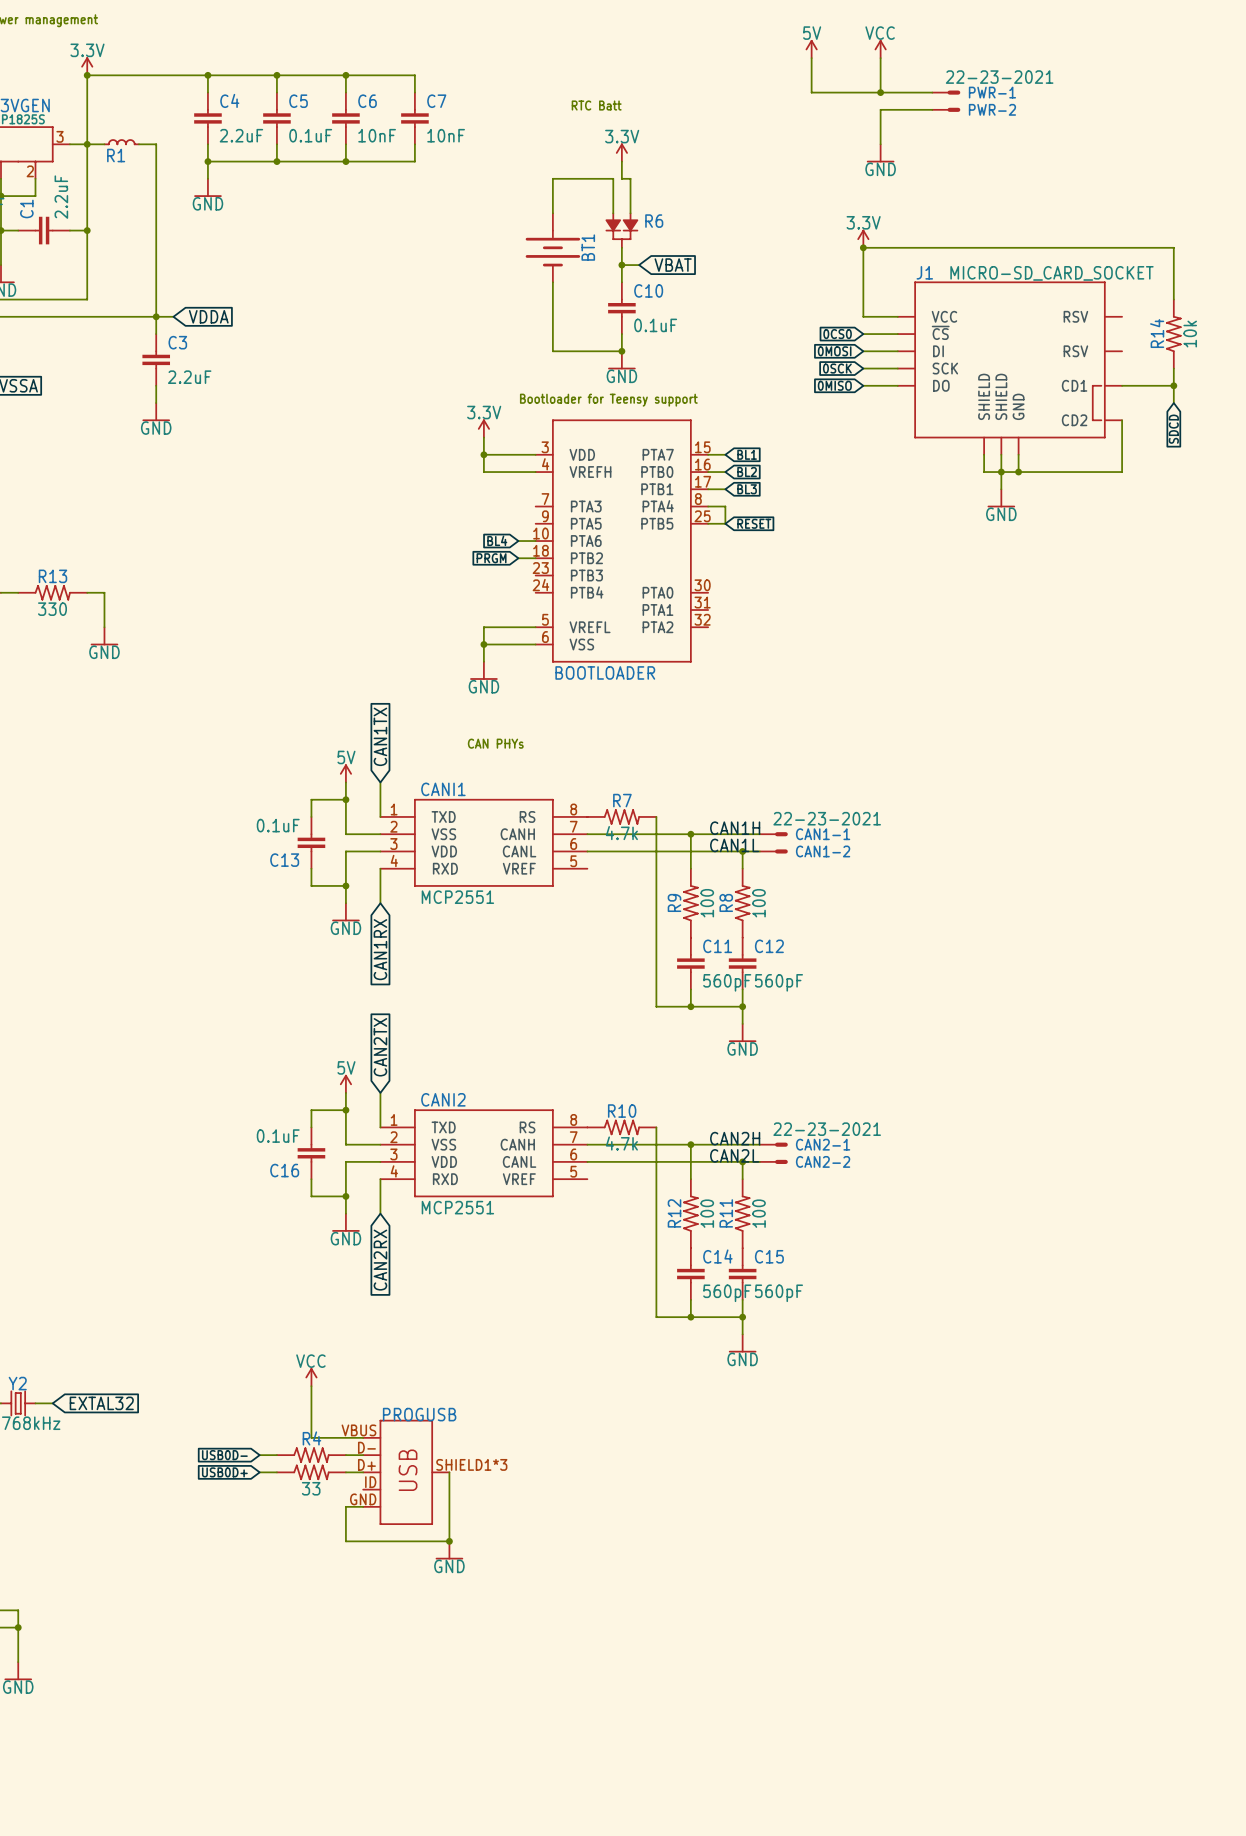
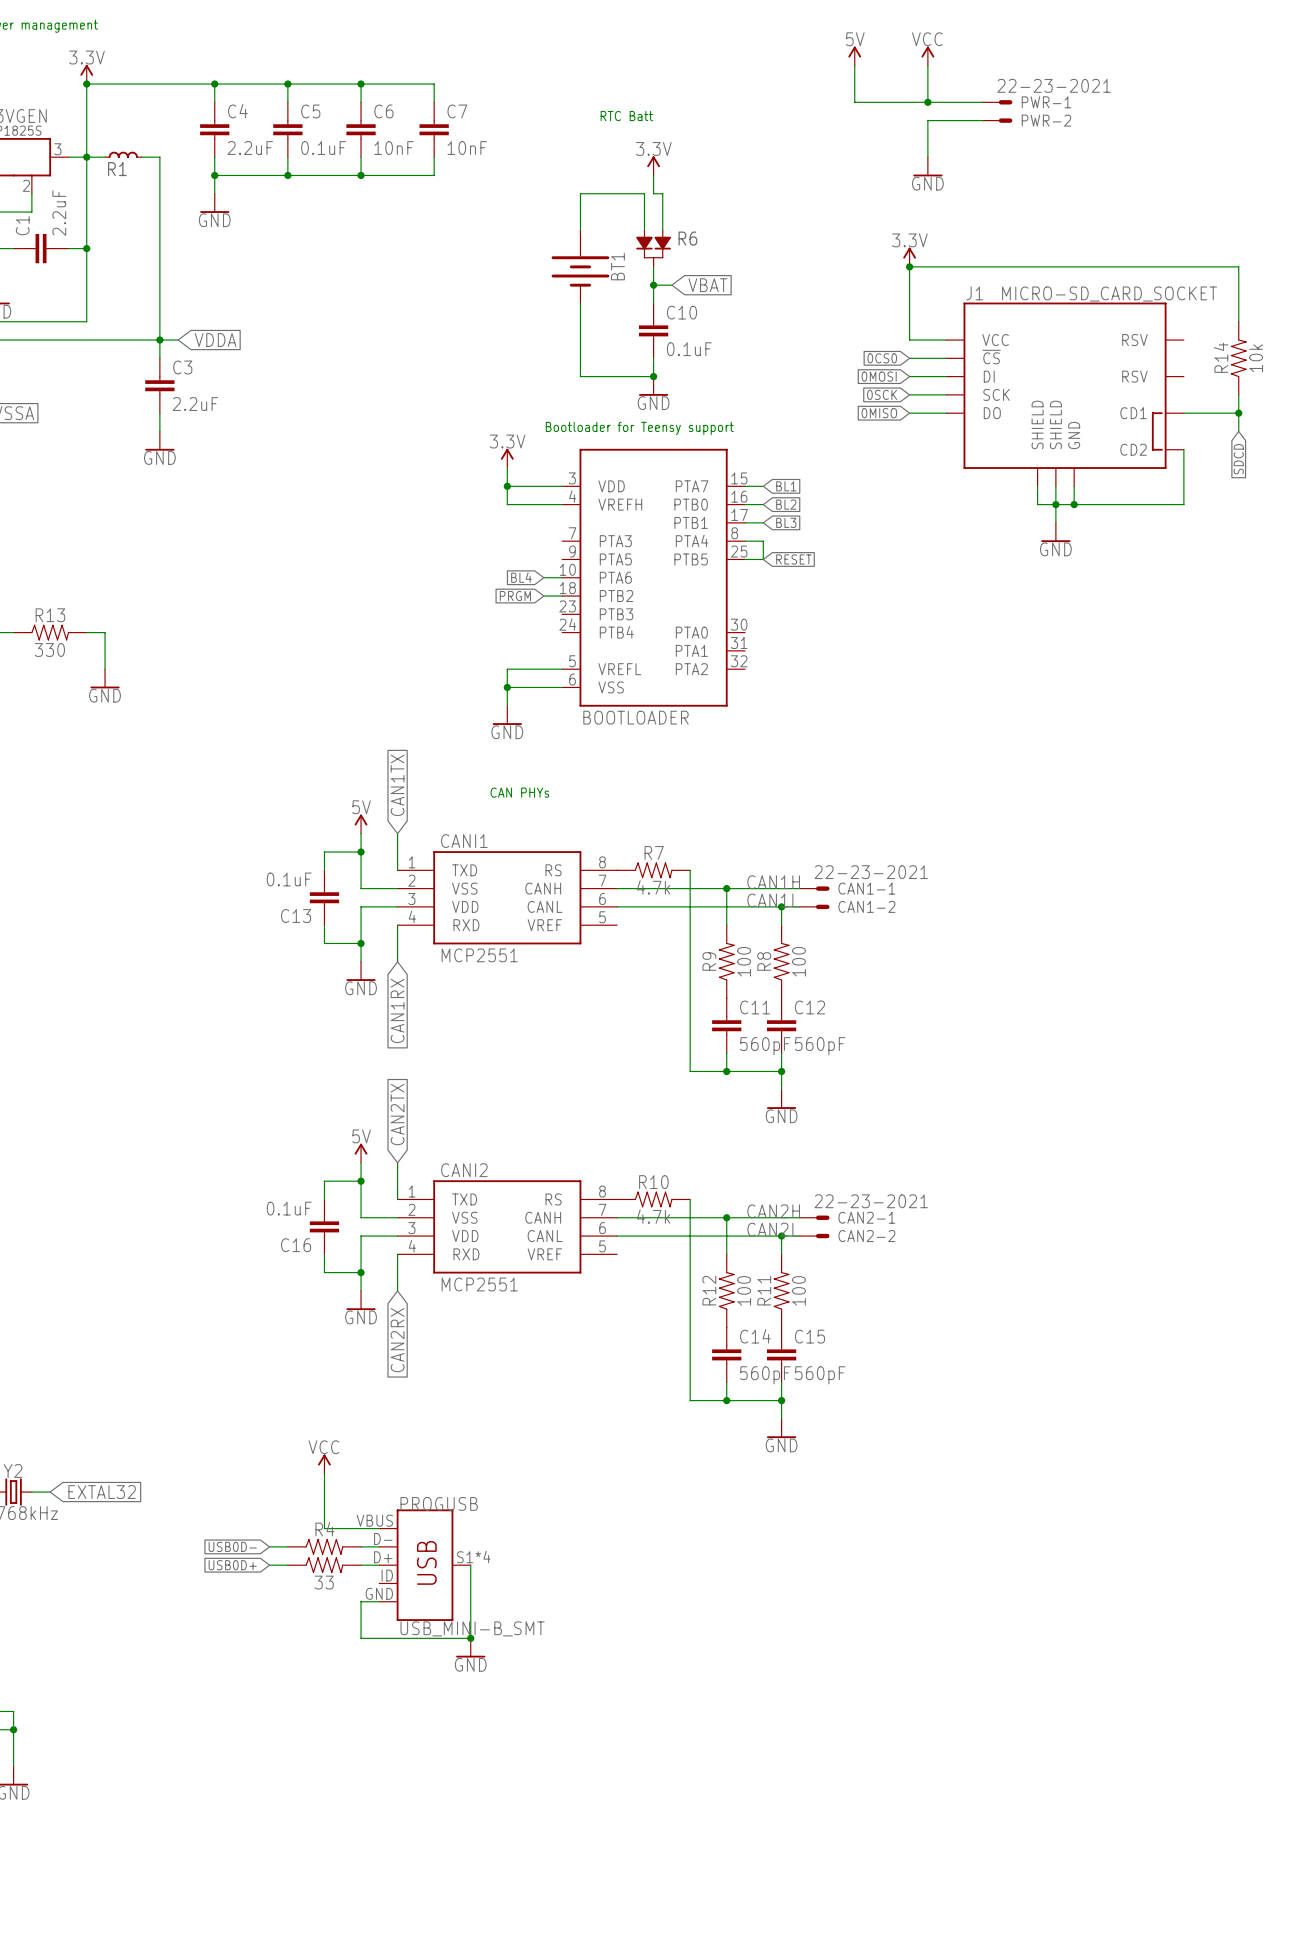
PROGUSB pin number: SHIELD1*3 (471, 1464) -> S1*4 (473, 1557)
PROGUSB value: none -> USB_MINI-B_SMT (472, 1628)

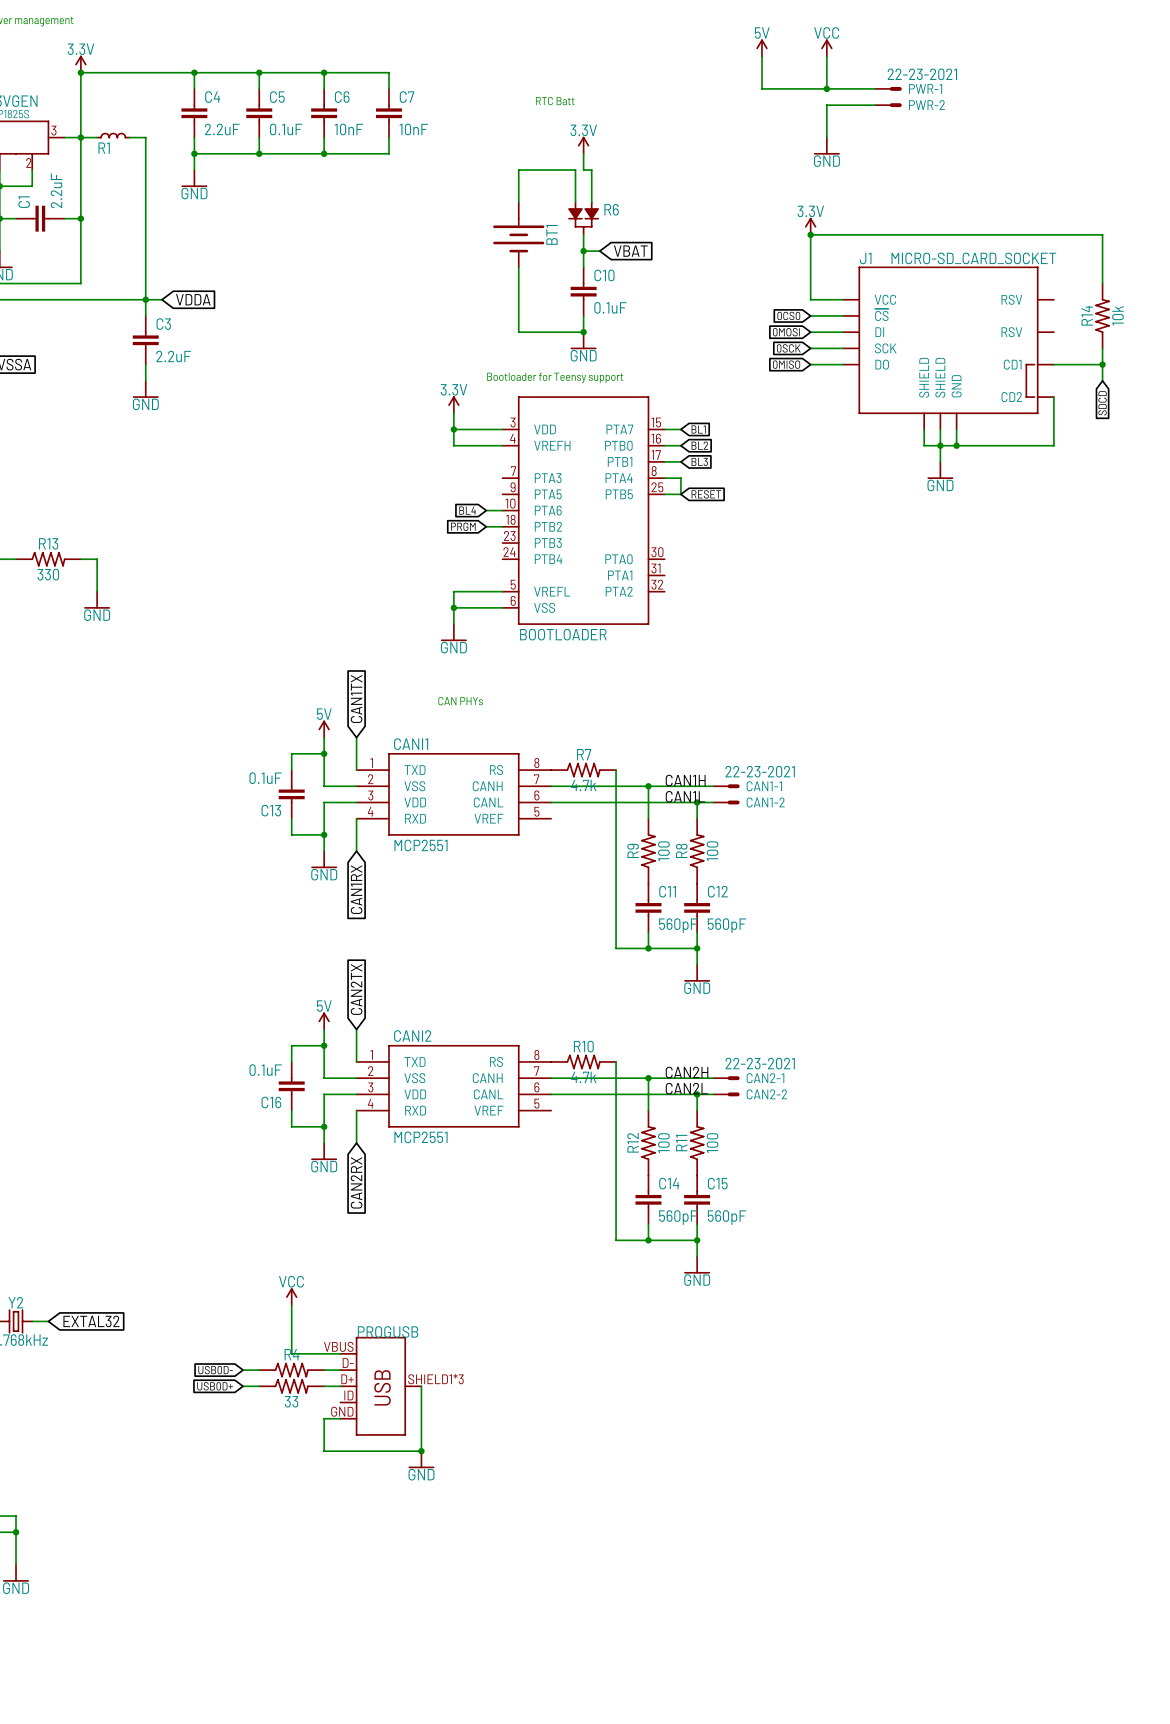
PROGUSB pin number: S1*4 (473, 1557) -> SHIELD1*3 (435, 1379)
PROGUSB value: USB_MINI-B_SMT (472, 1628) -> none

